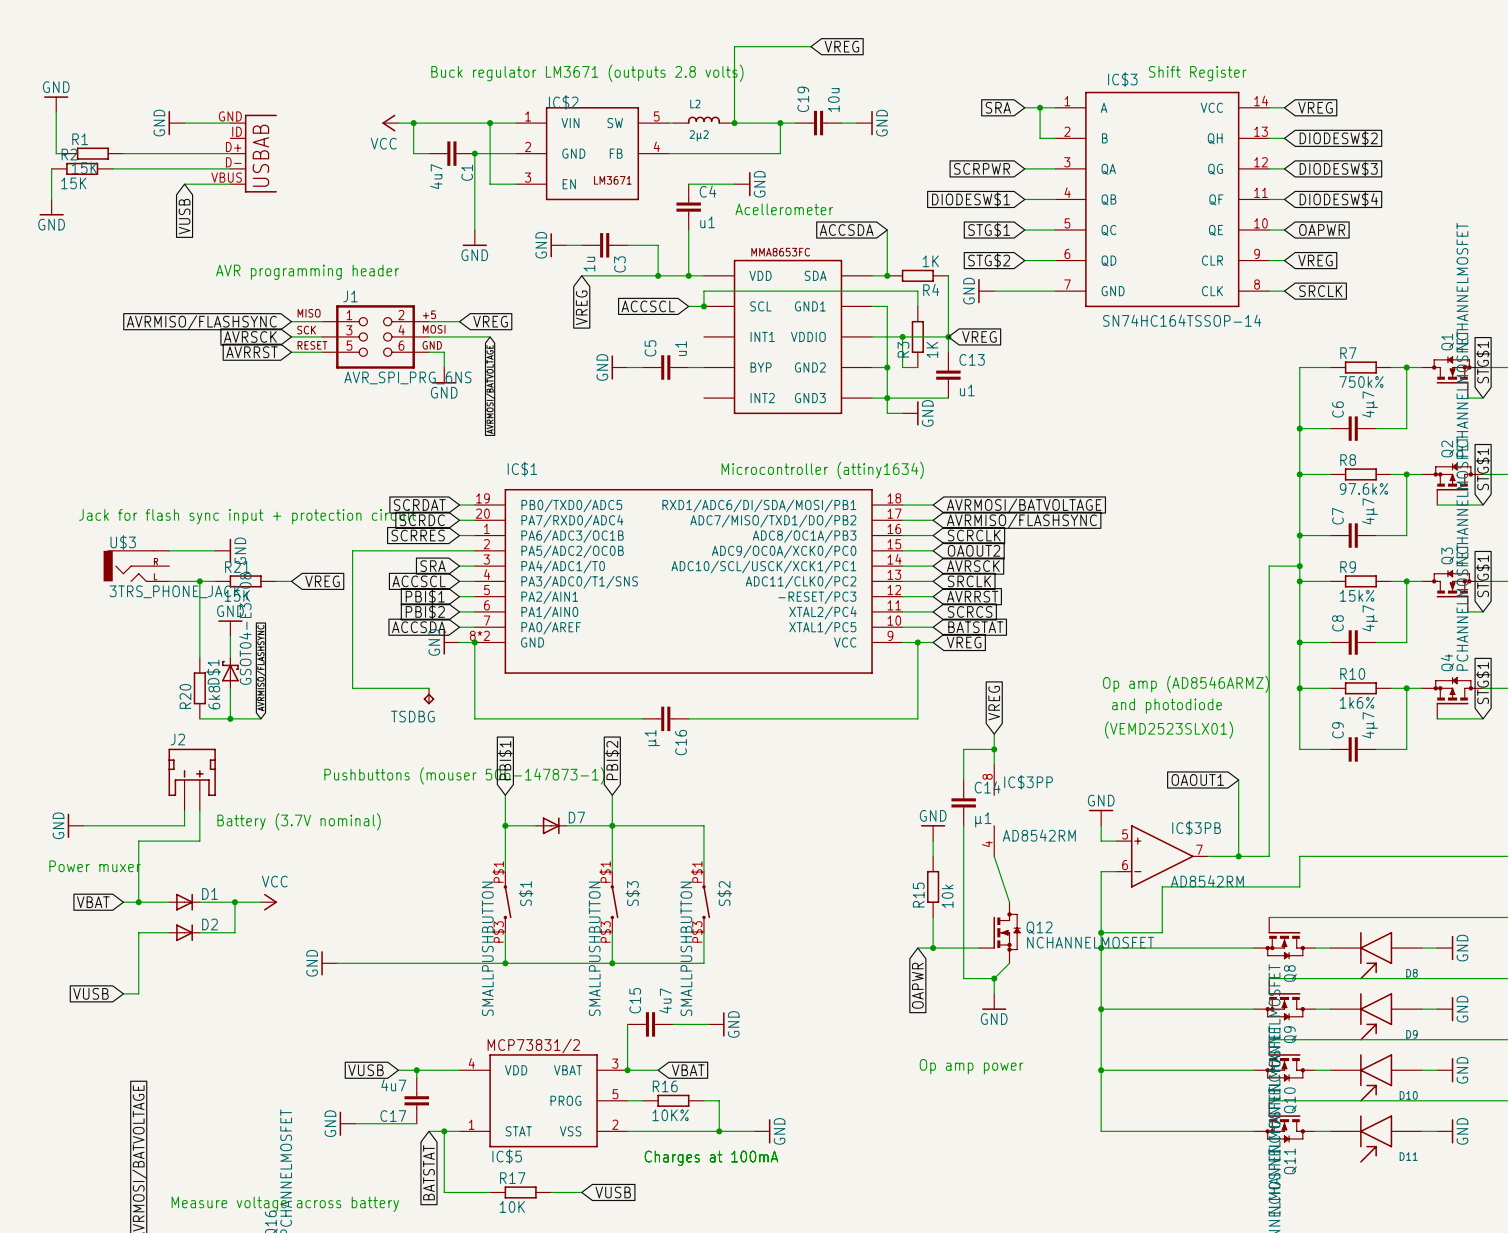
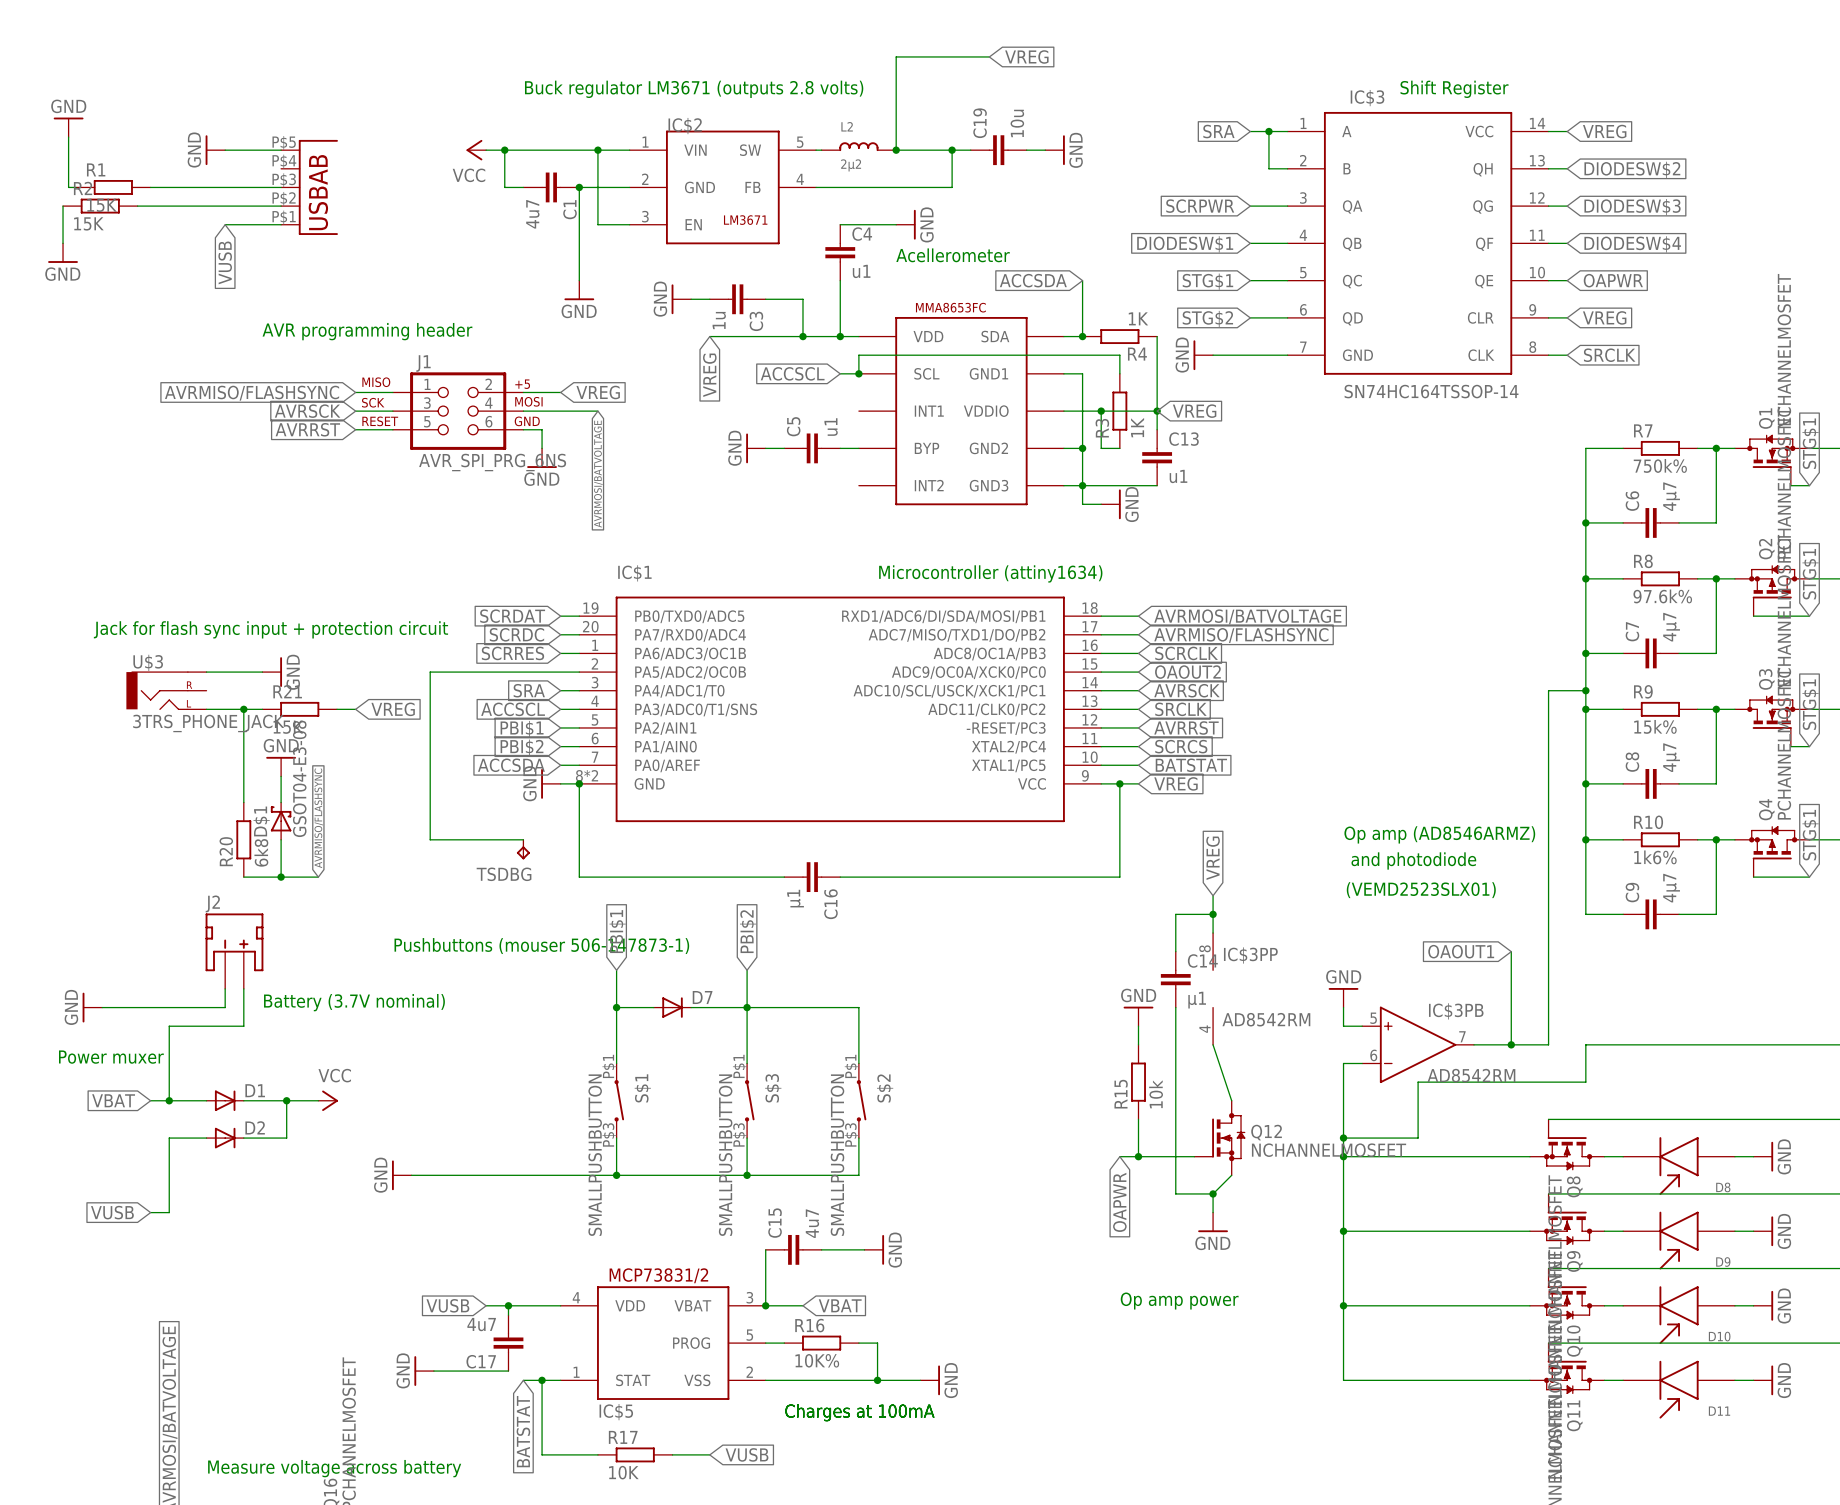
part pin number: GND (230, 116) -> P$5 (284, 142)
part pin number: ID (237, 131) -> P$4 (284, 161)
part pin number: D+ (233, 147) -> P$3 (284, 180)
part pin number: D- (233, 162) -> P$2 (284, 198)
part pin number: VBUS (226, 177) -> P$1 (284, 217)

